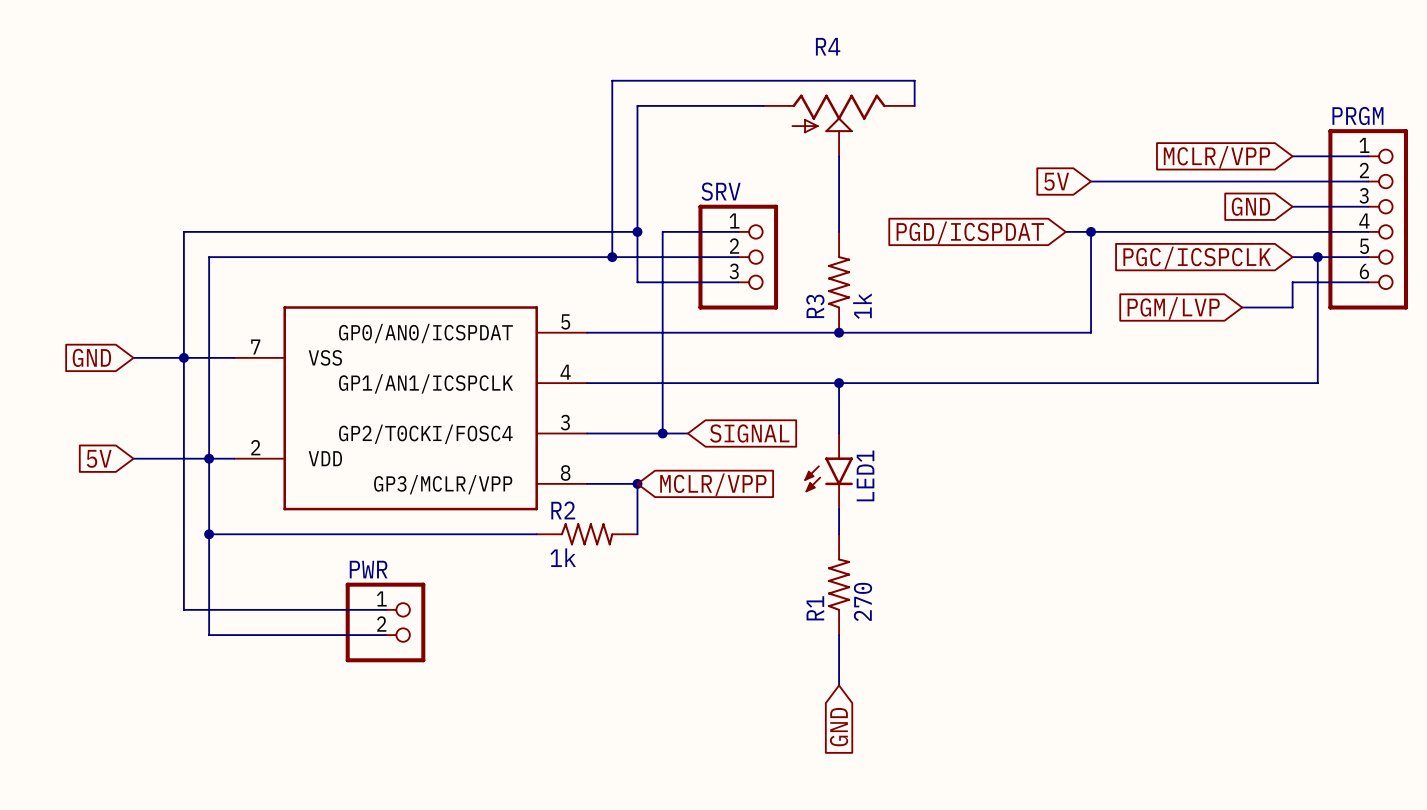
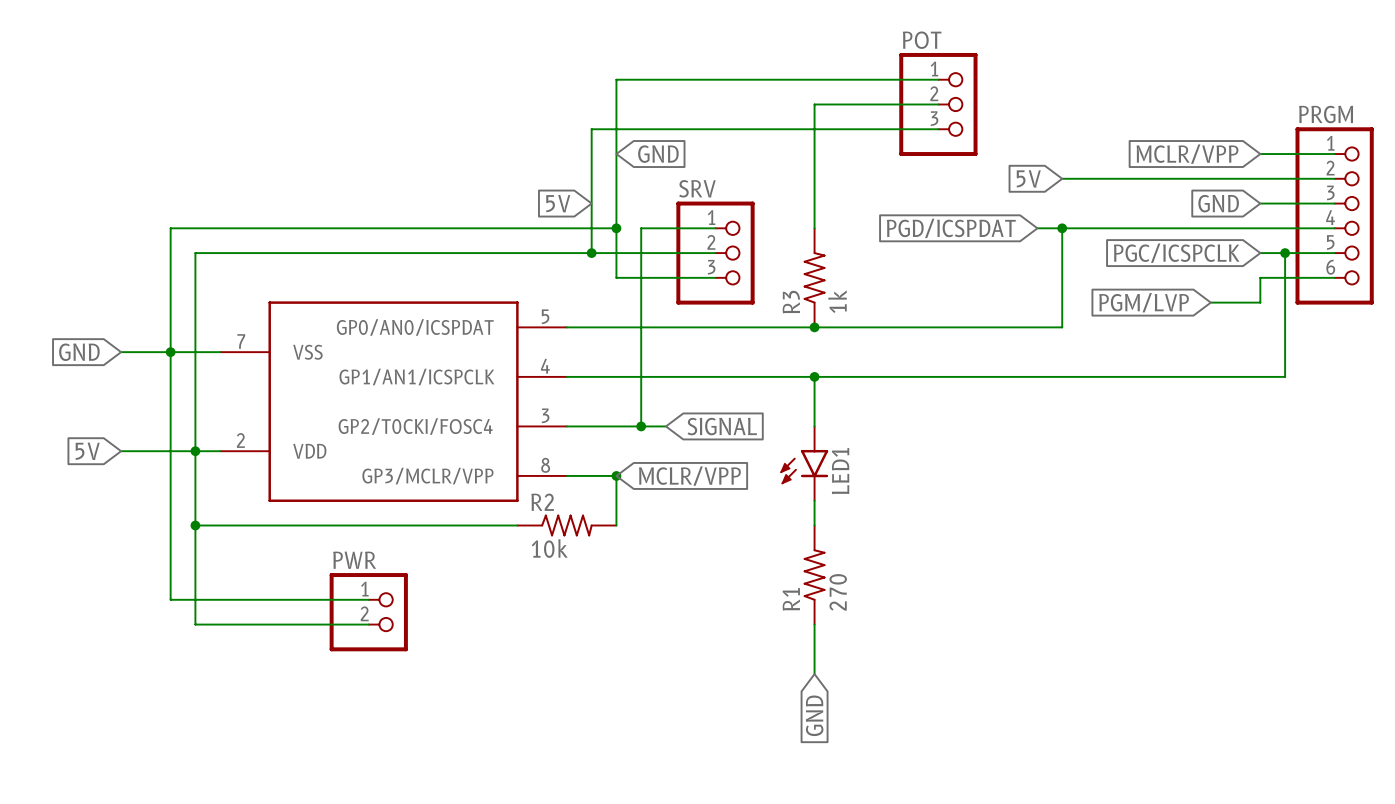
wire: (637, 80) (612, 80) (612, 131) -> (616, 79) (616, 104)
wire: (914, 80) (914, 105) -> (888, 79) (938, 79)
wire: (637, 105) (763, 105) -> none
wire: none -> (938, 104) (814, 104) (814, 154)
POT: none -> (938, 104)
R4: (839, 125) -> none
wire: none -> (591, 129) (938, 129)
global label: none -> GND (658, 154)
global label: none -> 5V (558, 203)
R2 value: 1k (563, 557) -> 10k (549, 548)

